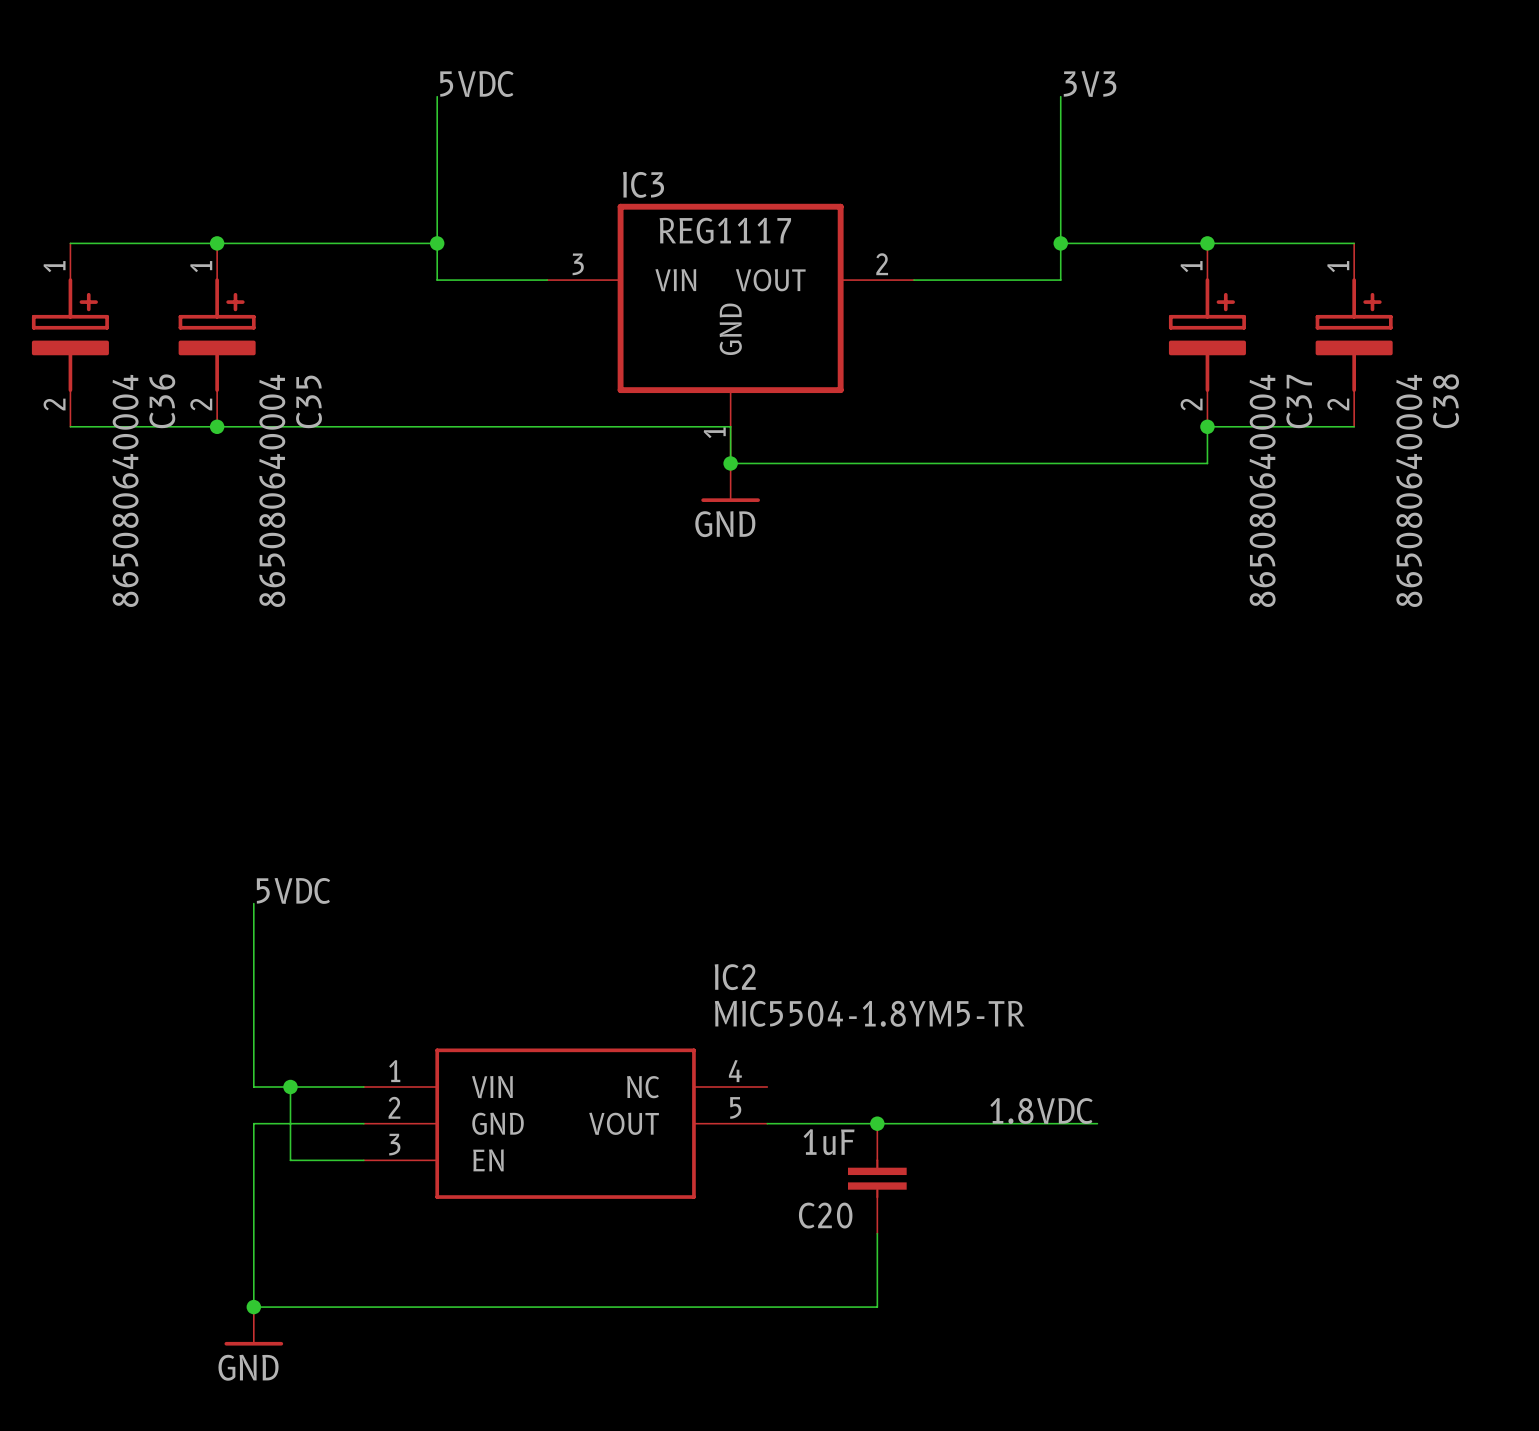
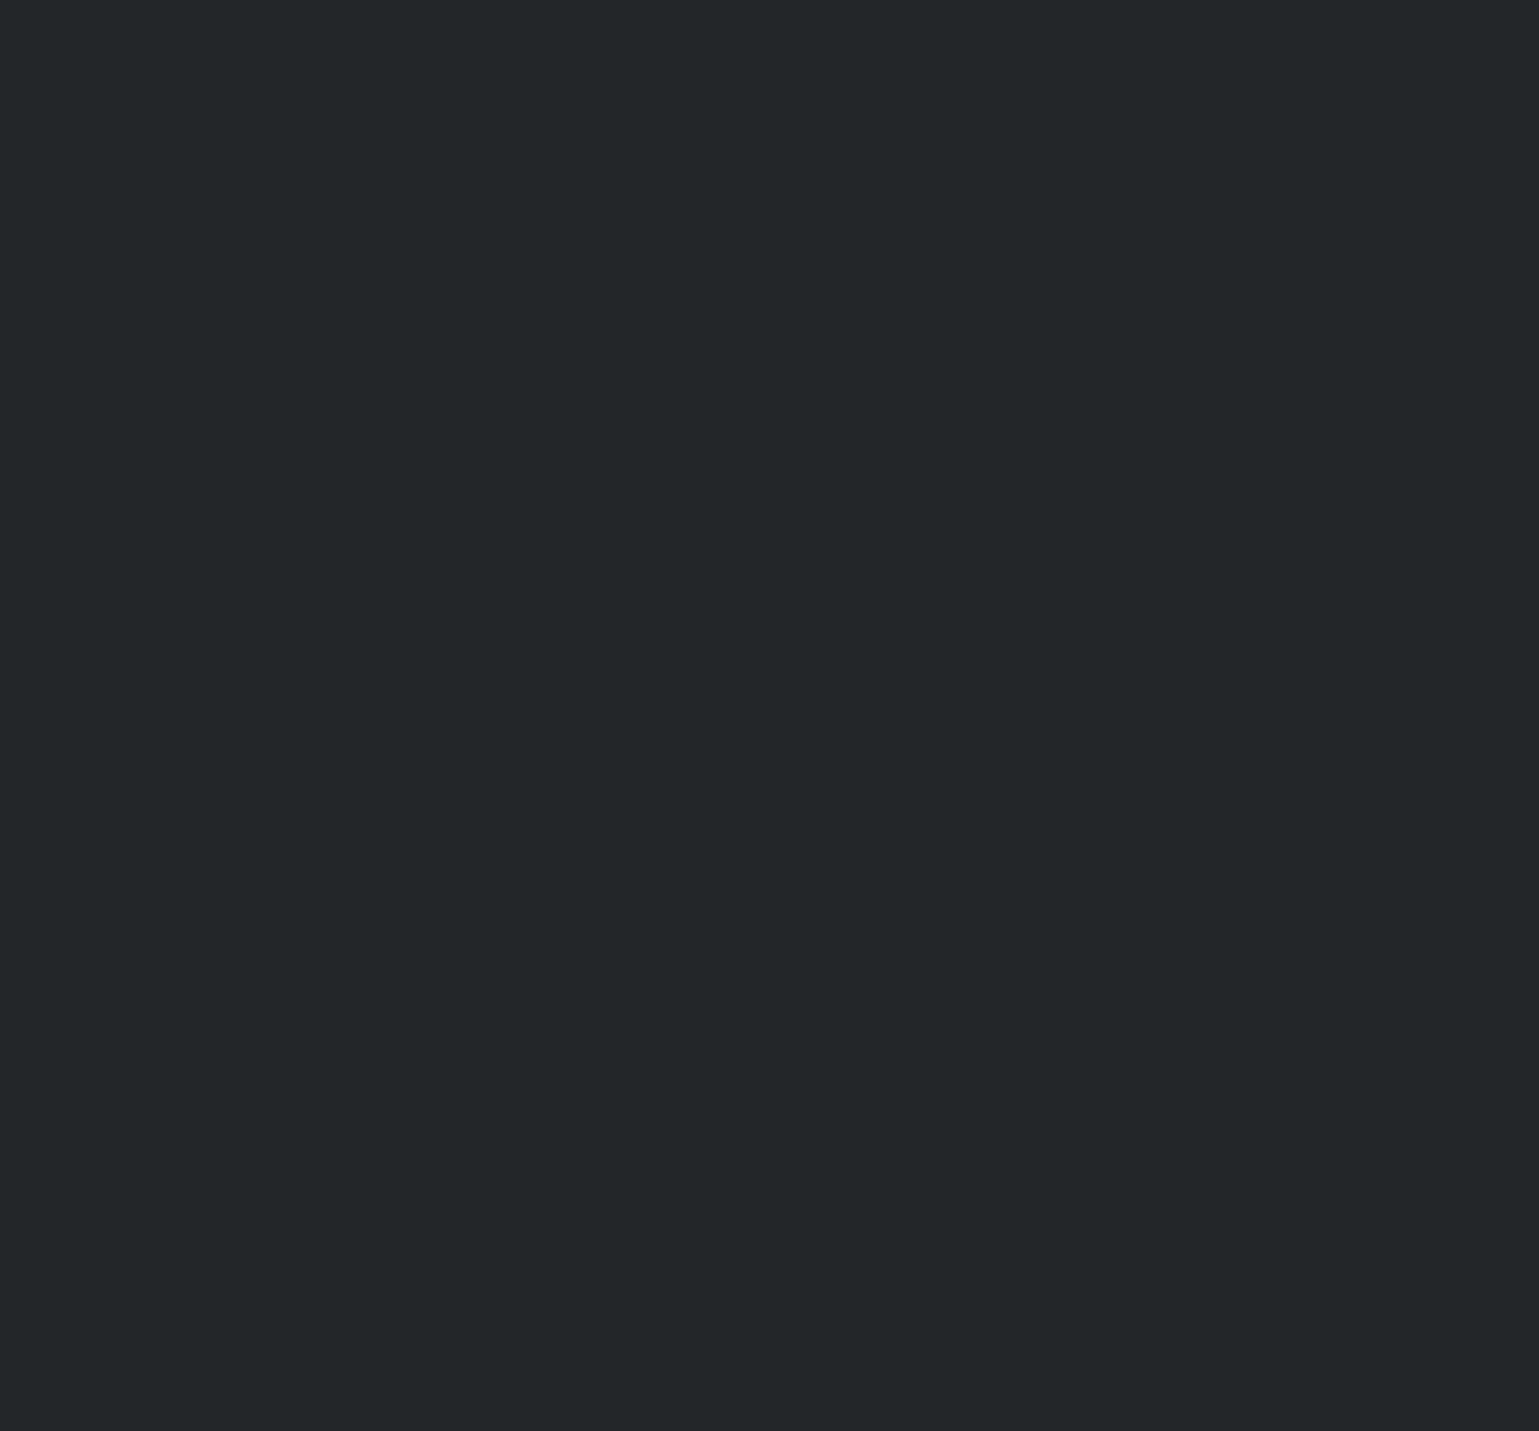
label: 5VDC (476, 84) -> none
label: 3V3 (1090, 84) -> none
wire: (437, 96) (437, 280) (547, 280) -> none
wire: (1060, 96) (1060, 280) (914, 280) -> none
wire: (70, 243) (437, 243) -> none
junction: (217, 243) -> none
junction: (437, 243) -> none
wire: (1060, 243) (1354, 243) -> none
junction: (1060, 243) -> none
junction: (1207, 243) -> none
IC3: REG1117 (730, 333) -> none
C36: 865080640004 (70, 335) -> none
C35: 865080640004 (217, 335) -> none
C37: 865080640004 (1207, 335) -> none
C38: 865080640004 (1354, 335) -> none
wire: (70, 426) (730, 426) (730, 463) (1207, 463) (1207, 426) (1354, 426) -> none
junction: (217, 426) -> none
junction: (1207, 426) -> none
junction: (730, 463) -> none
power symbol: GND (730, 482) -> none
label: 5VDC (293, 890) -> none
wire: (253, 903) (253, 1087) (363, 1087) -> none
wire: (290, 1087) (290, 1160) (363, 1160) -> none
junction: (290, 1087) -> none
label: 1.8VDC (1041, 1111) -> none
wire: (363, 1123) (253, 1123) (253, 1307) (877, 1307) (877, 1233) -> none
IC2: MIC5504-1.8YM5-TR (565, 1123) -> none
wire: (767, 1123) (1097, 1123) -> none
junction: (877, 1123) -> none
C20: 1uF (877, 1178) -> none
junction: (253, 1307) -> none
power symbol: GND (253, 1326) -> none

